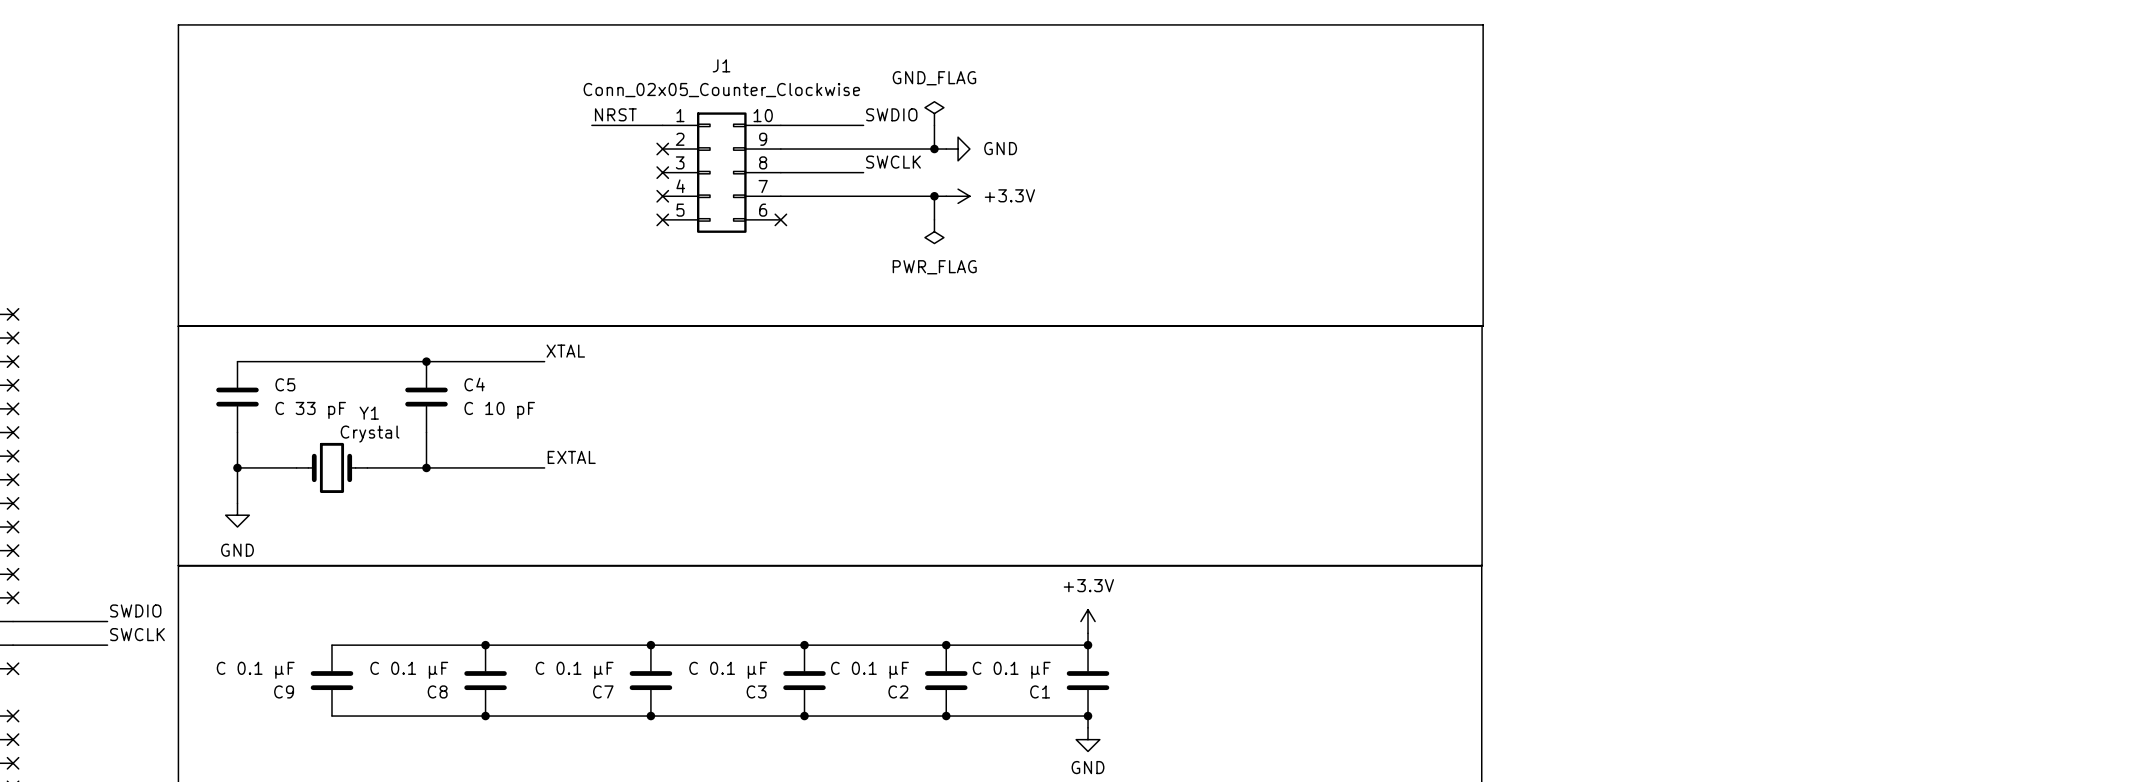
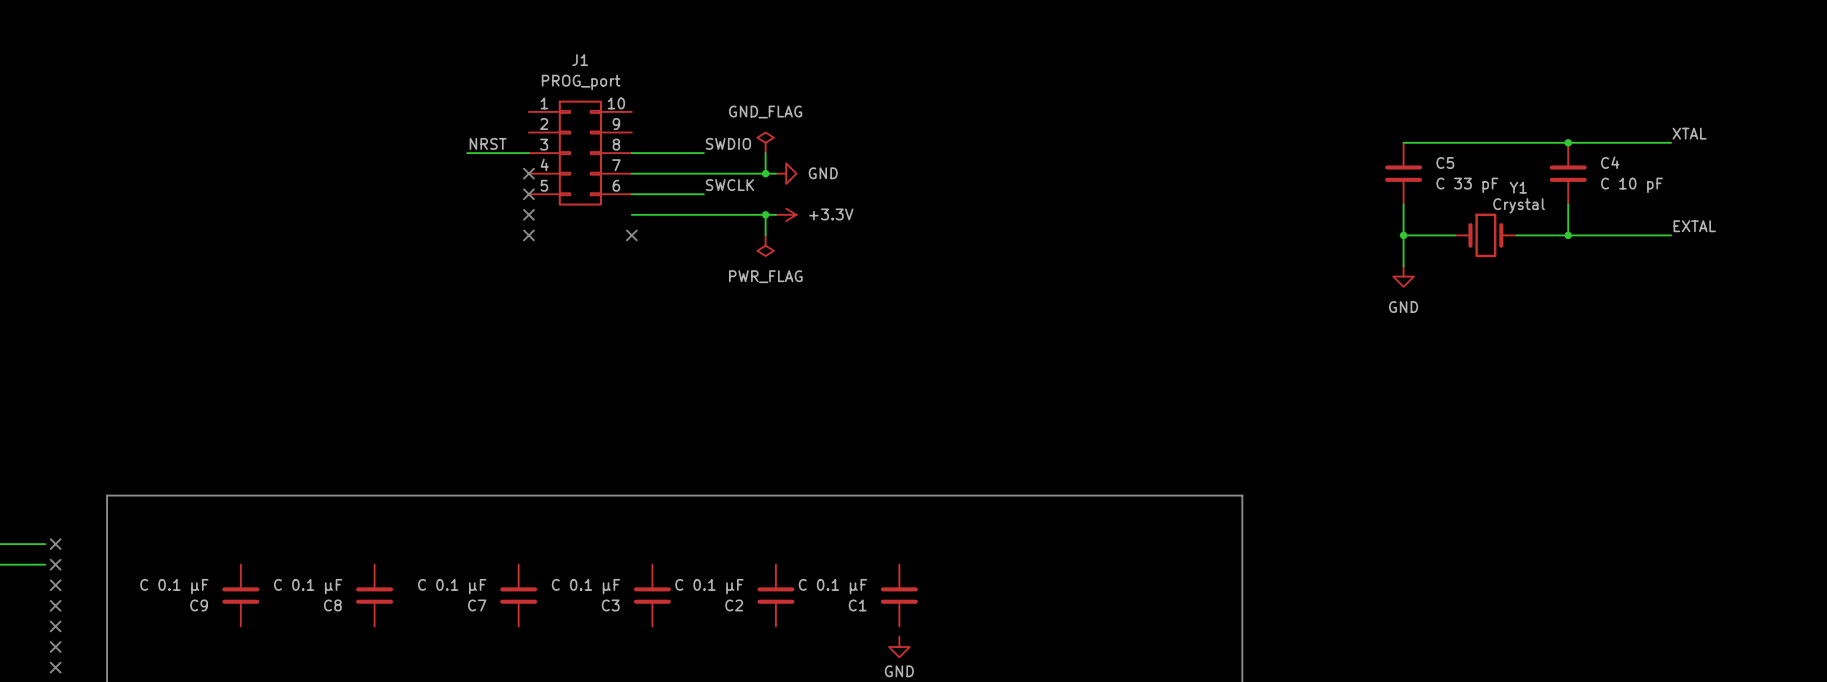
J1 value: Conn_02x05_Counter_Clockwise (721, 90) -> PROG_port (581, 82)
power symbol position: GND_FLAG (934, 113) -> GND_FLAG (765, 142)
label position: NRST (615, 114) -> NRST (488, 143)
label: SWDIO (891, 114) -> none
wire: (591, 125) (662, 125) -> (467, 153) (528, 153)
wire: (780, 125) (863, 125) -> (631, 194) (703, 194)
wire: (934, 125) (934, 149) -> (765, 214) (765, 235)
no-connect mark: (662, 149) -> none
wire: (780, 149) (946, 149) -> (631, 214) (775, 214)
junction: (934, 149) -> none
power symbol: GND (958, 149) -> none
label: none -> XTAL (1689, 133)
wire: none -> (1403, 142) (1671, 142)
junction: none -> (1568, 142)
label: SWCLK (893, 162) -> SWDIO (728, 143)
no-connect mark: (662, 172) -> none
wire: (934, 196) (934, 219) -> (765, 173) (765, 153)
power symbol: +3.3V (958, 196) -> GND (786, 173)
label: none -> SWCLK (729, 185)
no-connect mark position: (780, 219) -> (631, 235)
power symbol position: PWR_FLAG (934, 231) -> PWR_FLAG (765, 245)
wire: none -> (1403, 204) (1403, 266)
wire: none -> (1568, 204) (1568, 235)
no-connect mark: none -> (528, 214)
junction: none -> (765, 214)
power symbol: none -> +3.3V (786, 214)
label: none -> EXTAL (1694, 226)
no-connect mark: none -> (528, 235)
wire: none -> (1403, 235) (1455, 235)
junction: none -> (1403, 235)
wire: none -> (1516, 235) (1671, 235)
junction: none -> (1568, 235)
power symbol: none -> GND (1403, 276)
line: (178, 326) (1483, 326) (1483, 24) (178, 24) (178, 565) (1482, 565) (1482, 326) -> none
label: XTAL (565, 351) -> none
wire: (237, 361) (544, 361) -> none
junction: (426, 361) -> none
C5 position: (237, 397) -> (1403, 173)
C4 position: (426, 397) -> (1568, 173)
wire: (237, 432) (237, 503) -> none
wire: (426, 432) (426, 467) -> none
label: EXTAL (571, 457) -> none
wire: (237, 467) (296, 467) -> none
junction: (237, 467) -> none
Y1 position: (331, 467) -> (1485, 235)
wire: (367, 467) (544, 467) -> none
junction: (426, 467) -> none
power symbol: GND (237, 515) -> none
label: SWDIO (135, 610) -> none
no-connect mark: none -> (55, 544)
power symbol: +3.3V (1088, 621) -> none
wire: (1088, 633) (1088, 645) (331, 645) -> none
label: SWCLK (137, 634) -> none
no-connect mark: none -> (55, 564)
junction: (485, 645) -> none
junction: (650, 645) -> none
junction: (804, 645) -> none
junction: (946, 645) -> none
junction: (1088, 645) -> none
no-connect mark: none -> (55, 585)
no-connect mark: none -> (55, 605)
no-connect mark: none -> (55, 626)
wire: (331, 716) (1088, 716) (1088, 727) -> none
junction: (485, 716) -> none
junction: (650, 716) -> none
junction: (804, 716) -> none
junction: (946, 716) -> none
junction: (1088, 716) -> none
no-connect mark: none -> (55, 647)
no-connect mark: none -> (55, 667)

